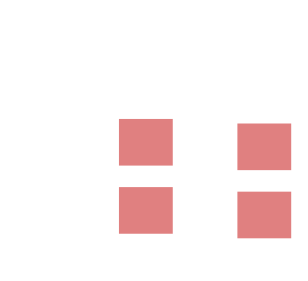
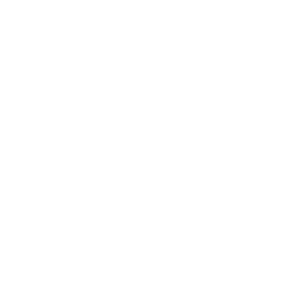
part: (145, 176) -> none
part: (264, 180) -> none

